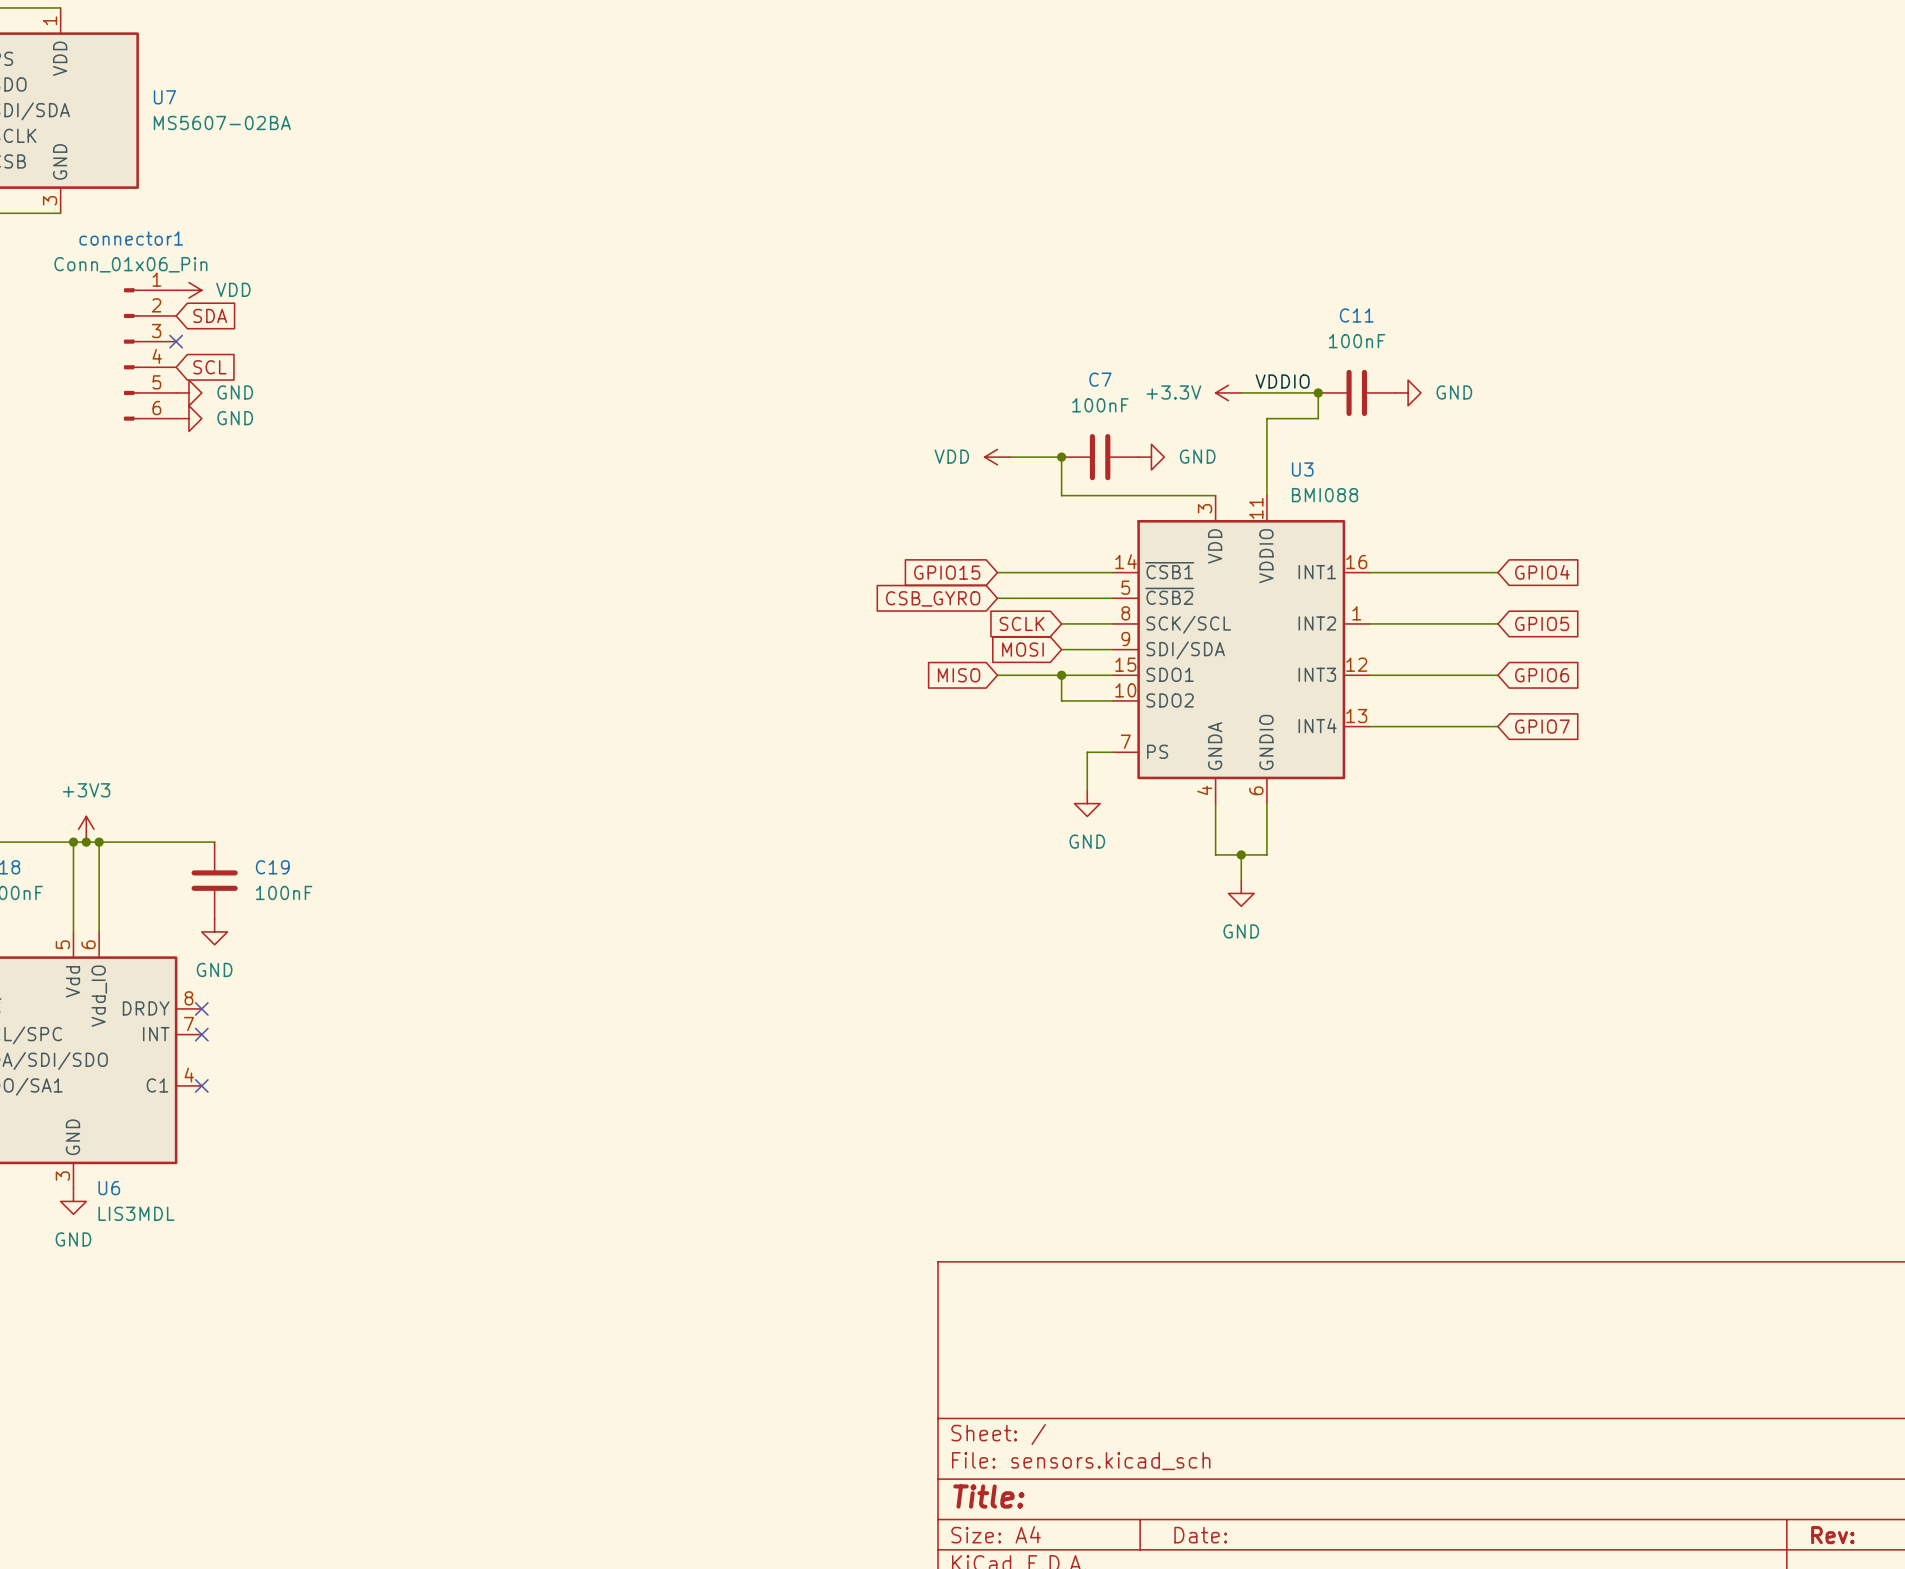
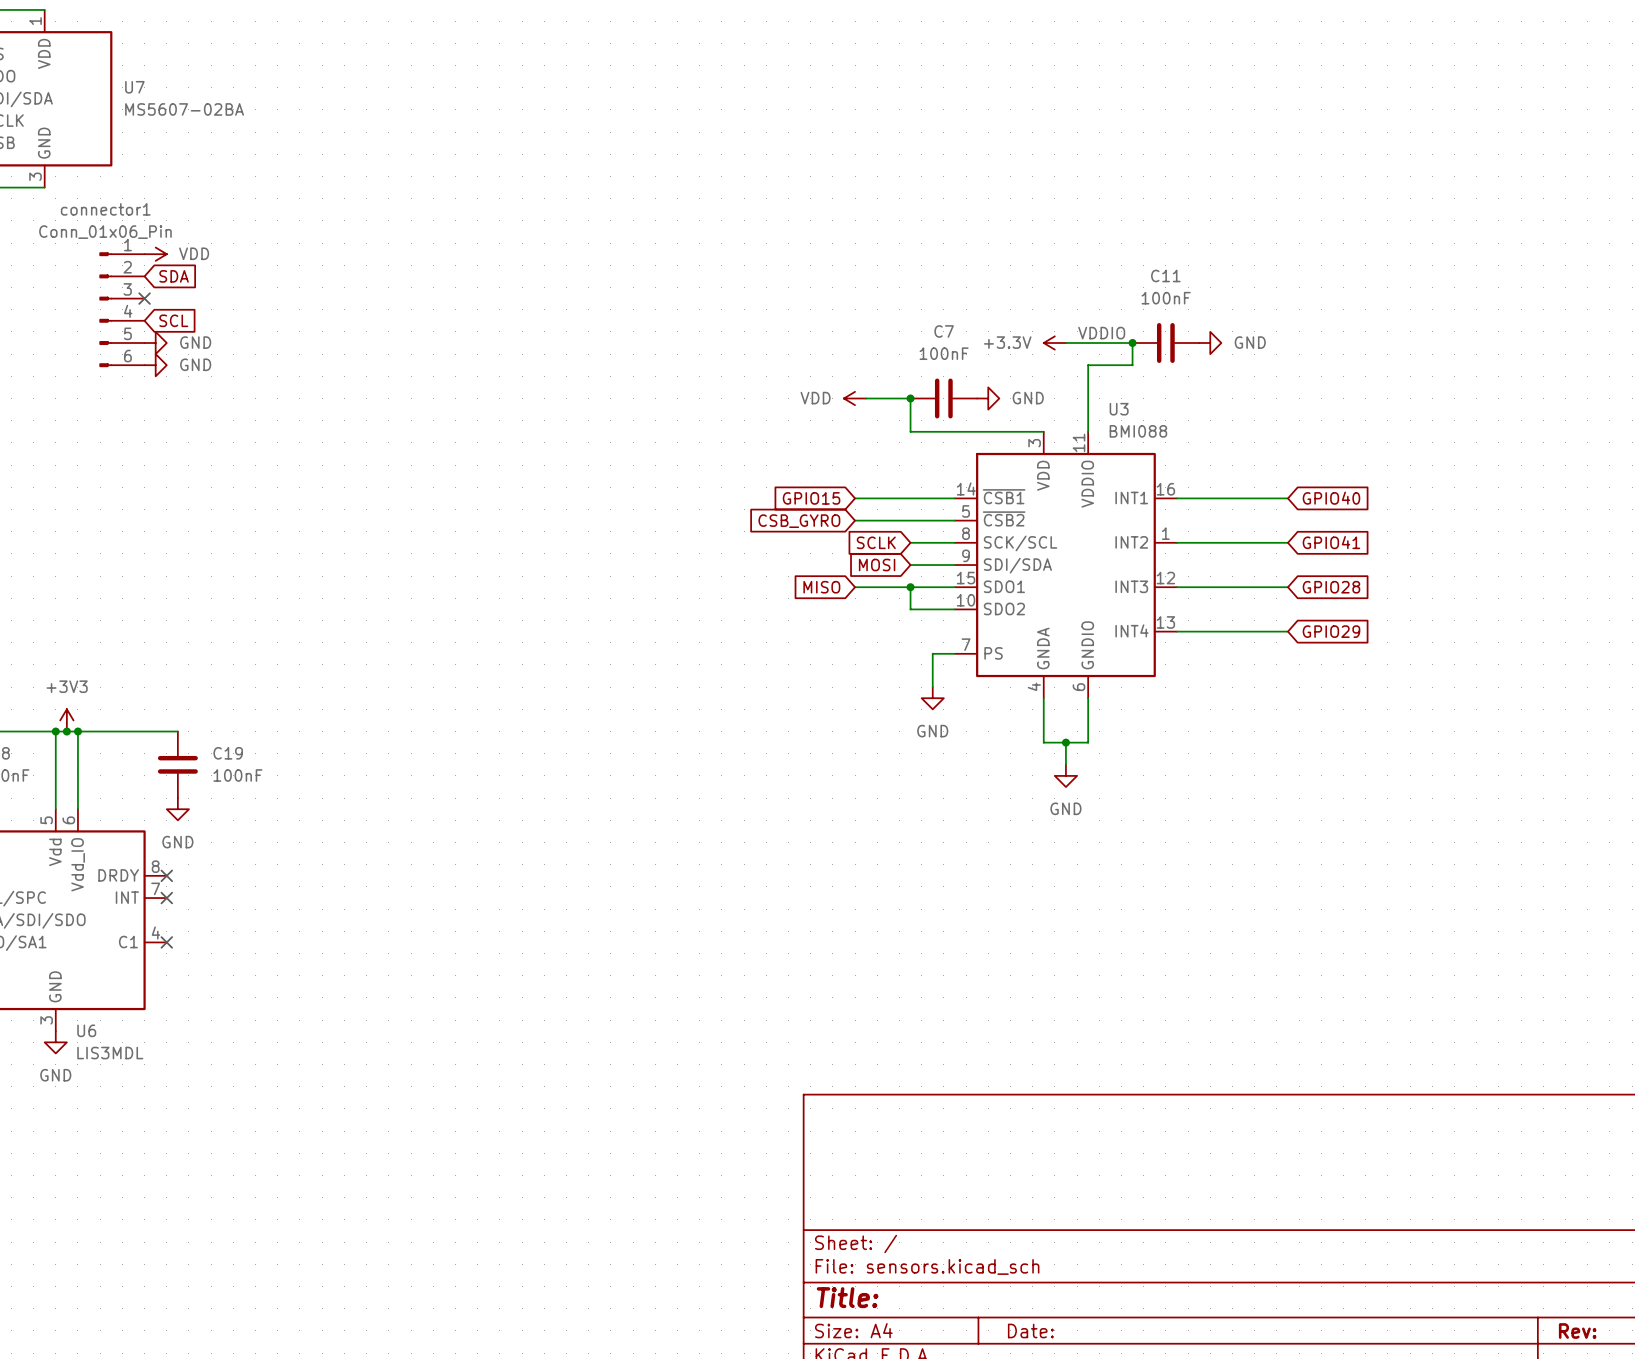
global label: GPIO4 (1542, 572) -> GPIO40 (1331, 498)
global label: GPIO5 (1542, 623) -> GPIO41 (1331, 542)
global label: GPIO6 (1542, 675) -> GPIO28 (1331, 587)
global label: GPIO7 (1542, 726) -> GPIO29 (1331, 631)

